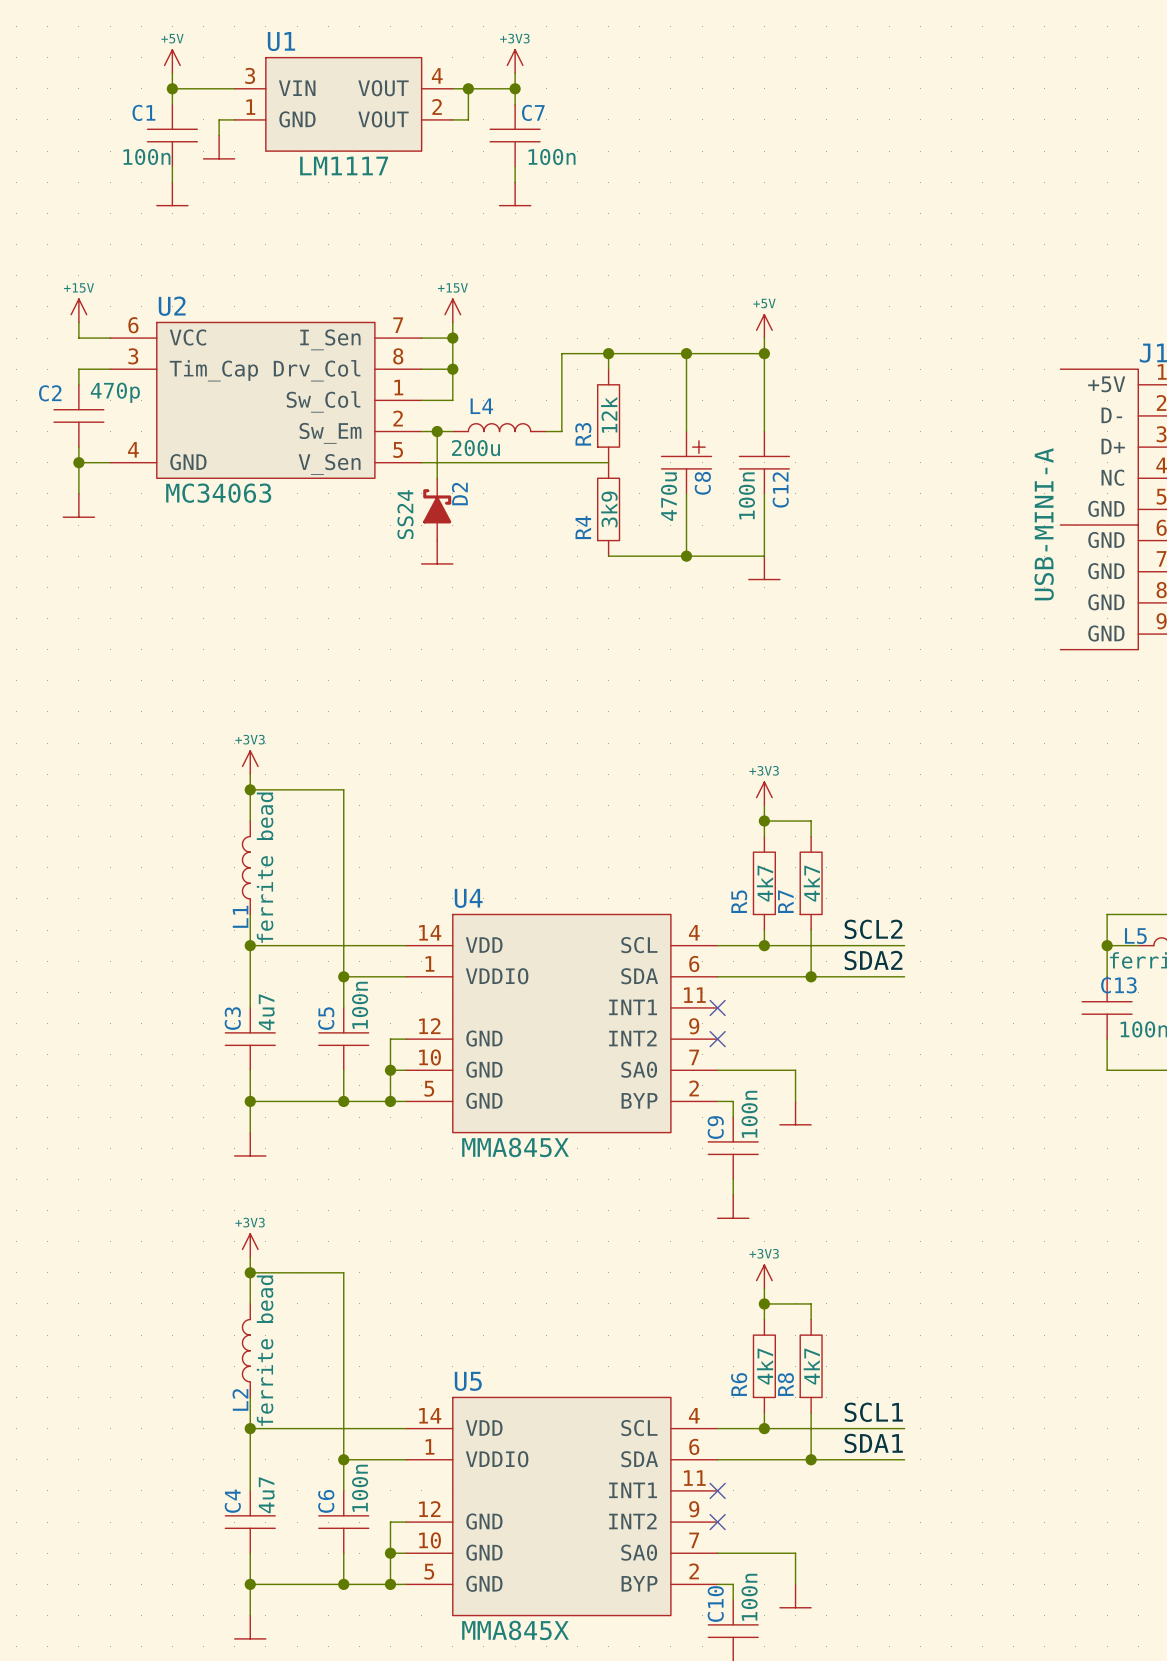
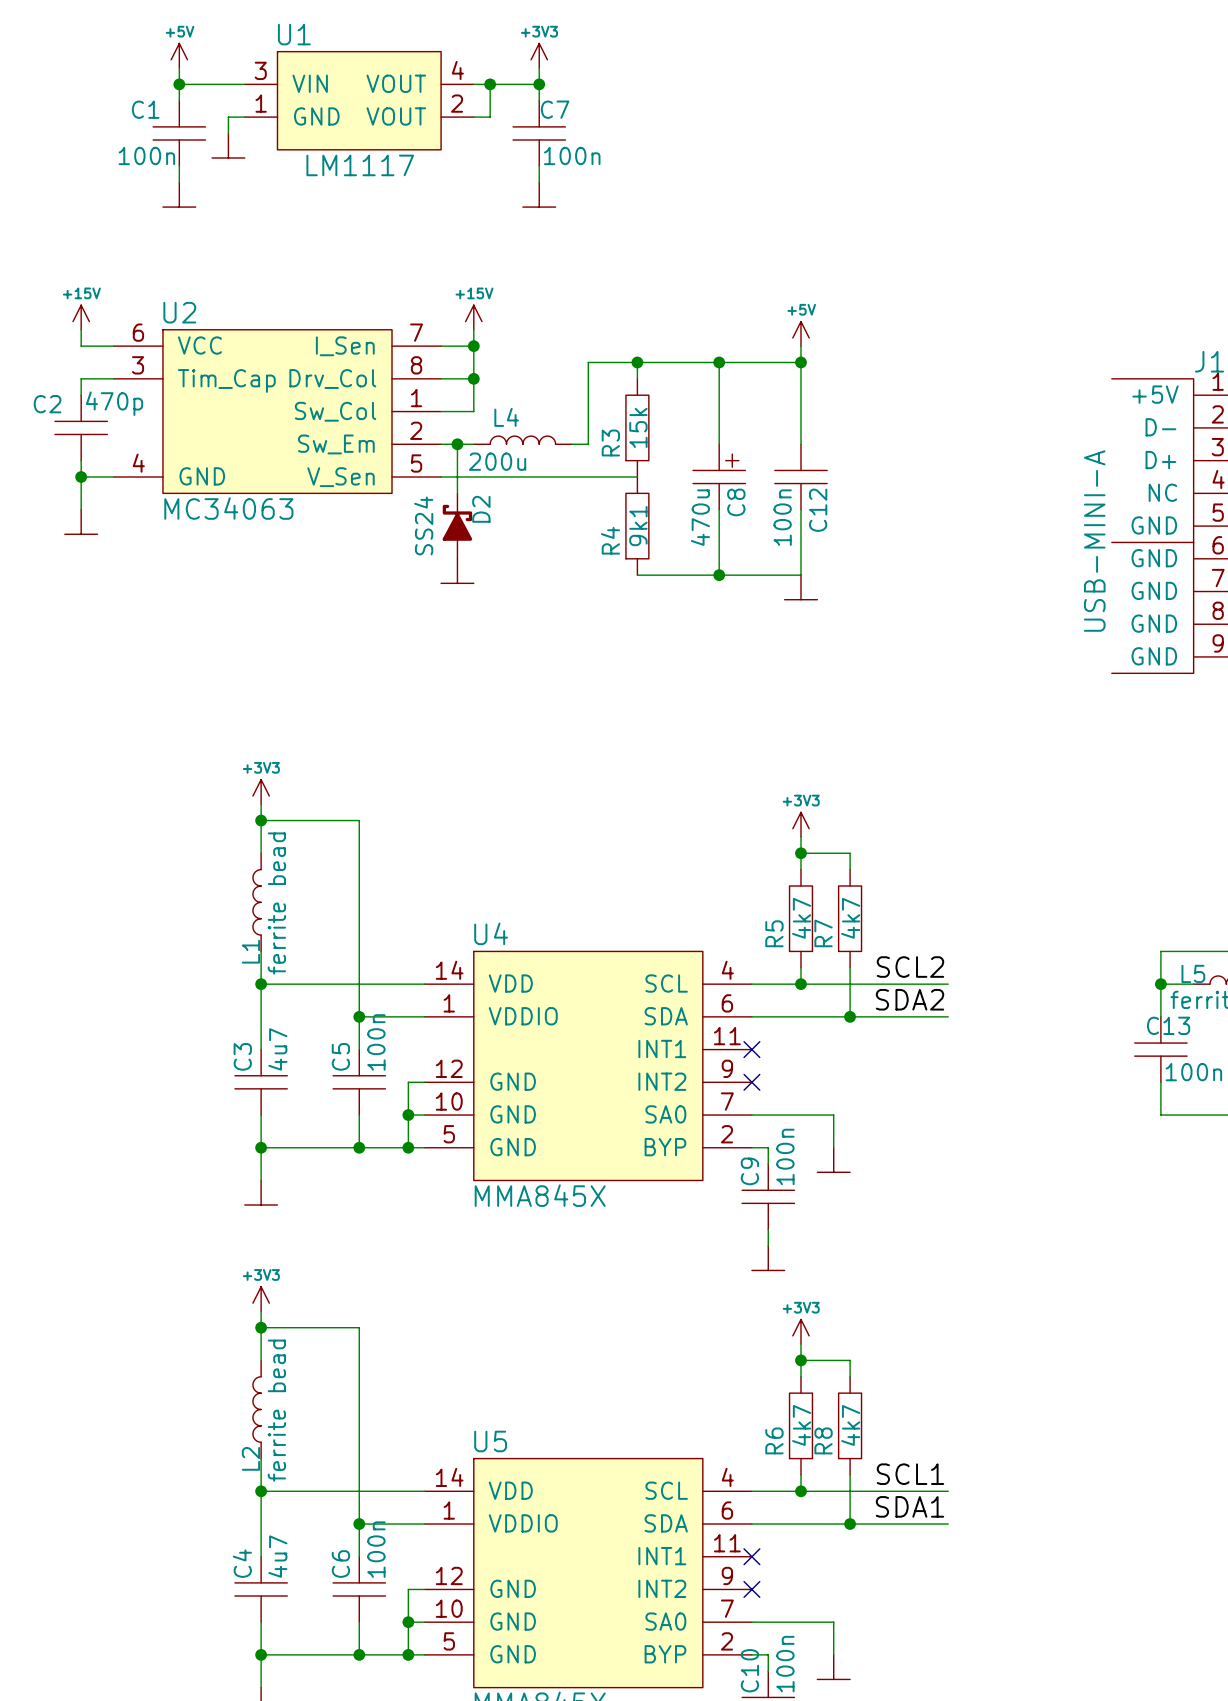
R3 value: 12k (609, 414) -> 15k (638, 427)
R4 value: 3k9 (609, 509) -> 9k1 (638, 526)

